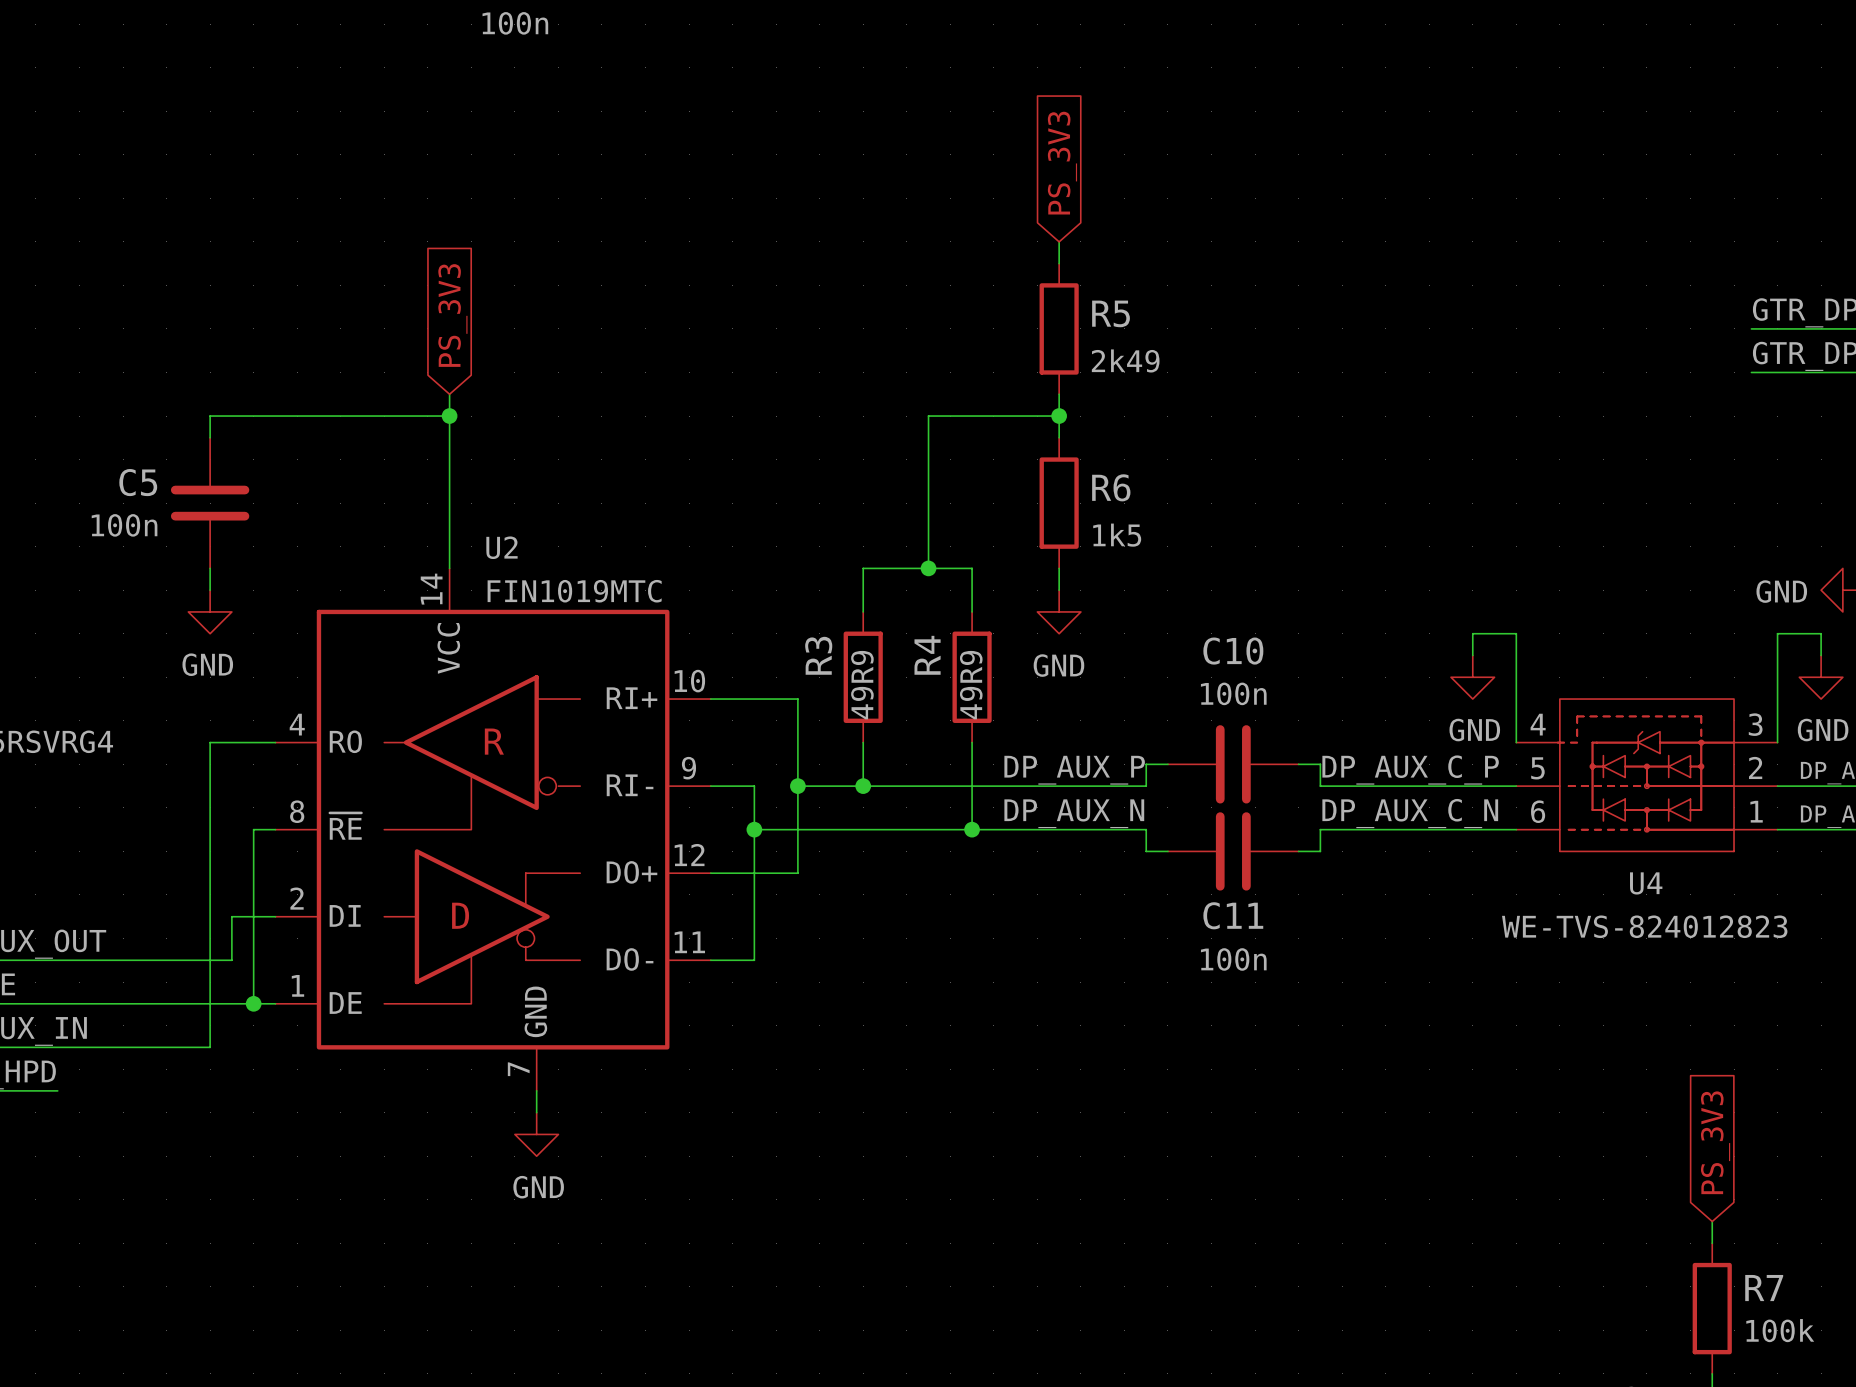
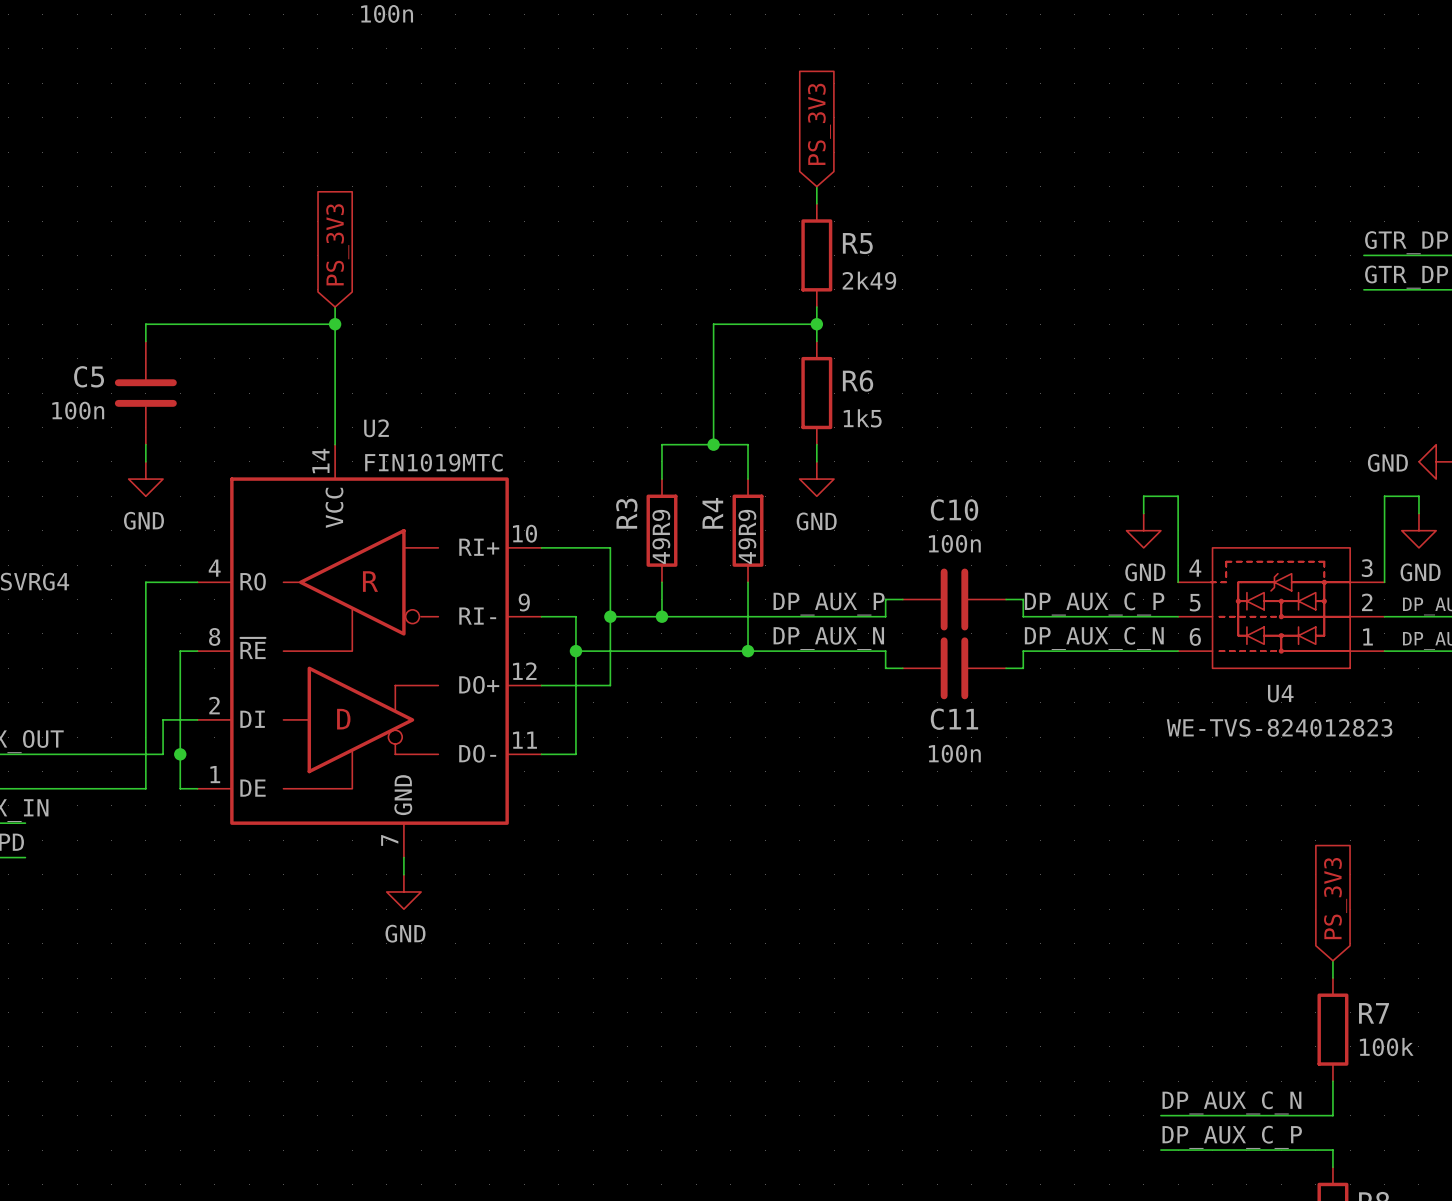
wire: (253, 1003) (210, 1003) (210, 1047) (57, 1047) -> none
junction position: (253, 1003) -> (180, 754)

